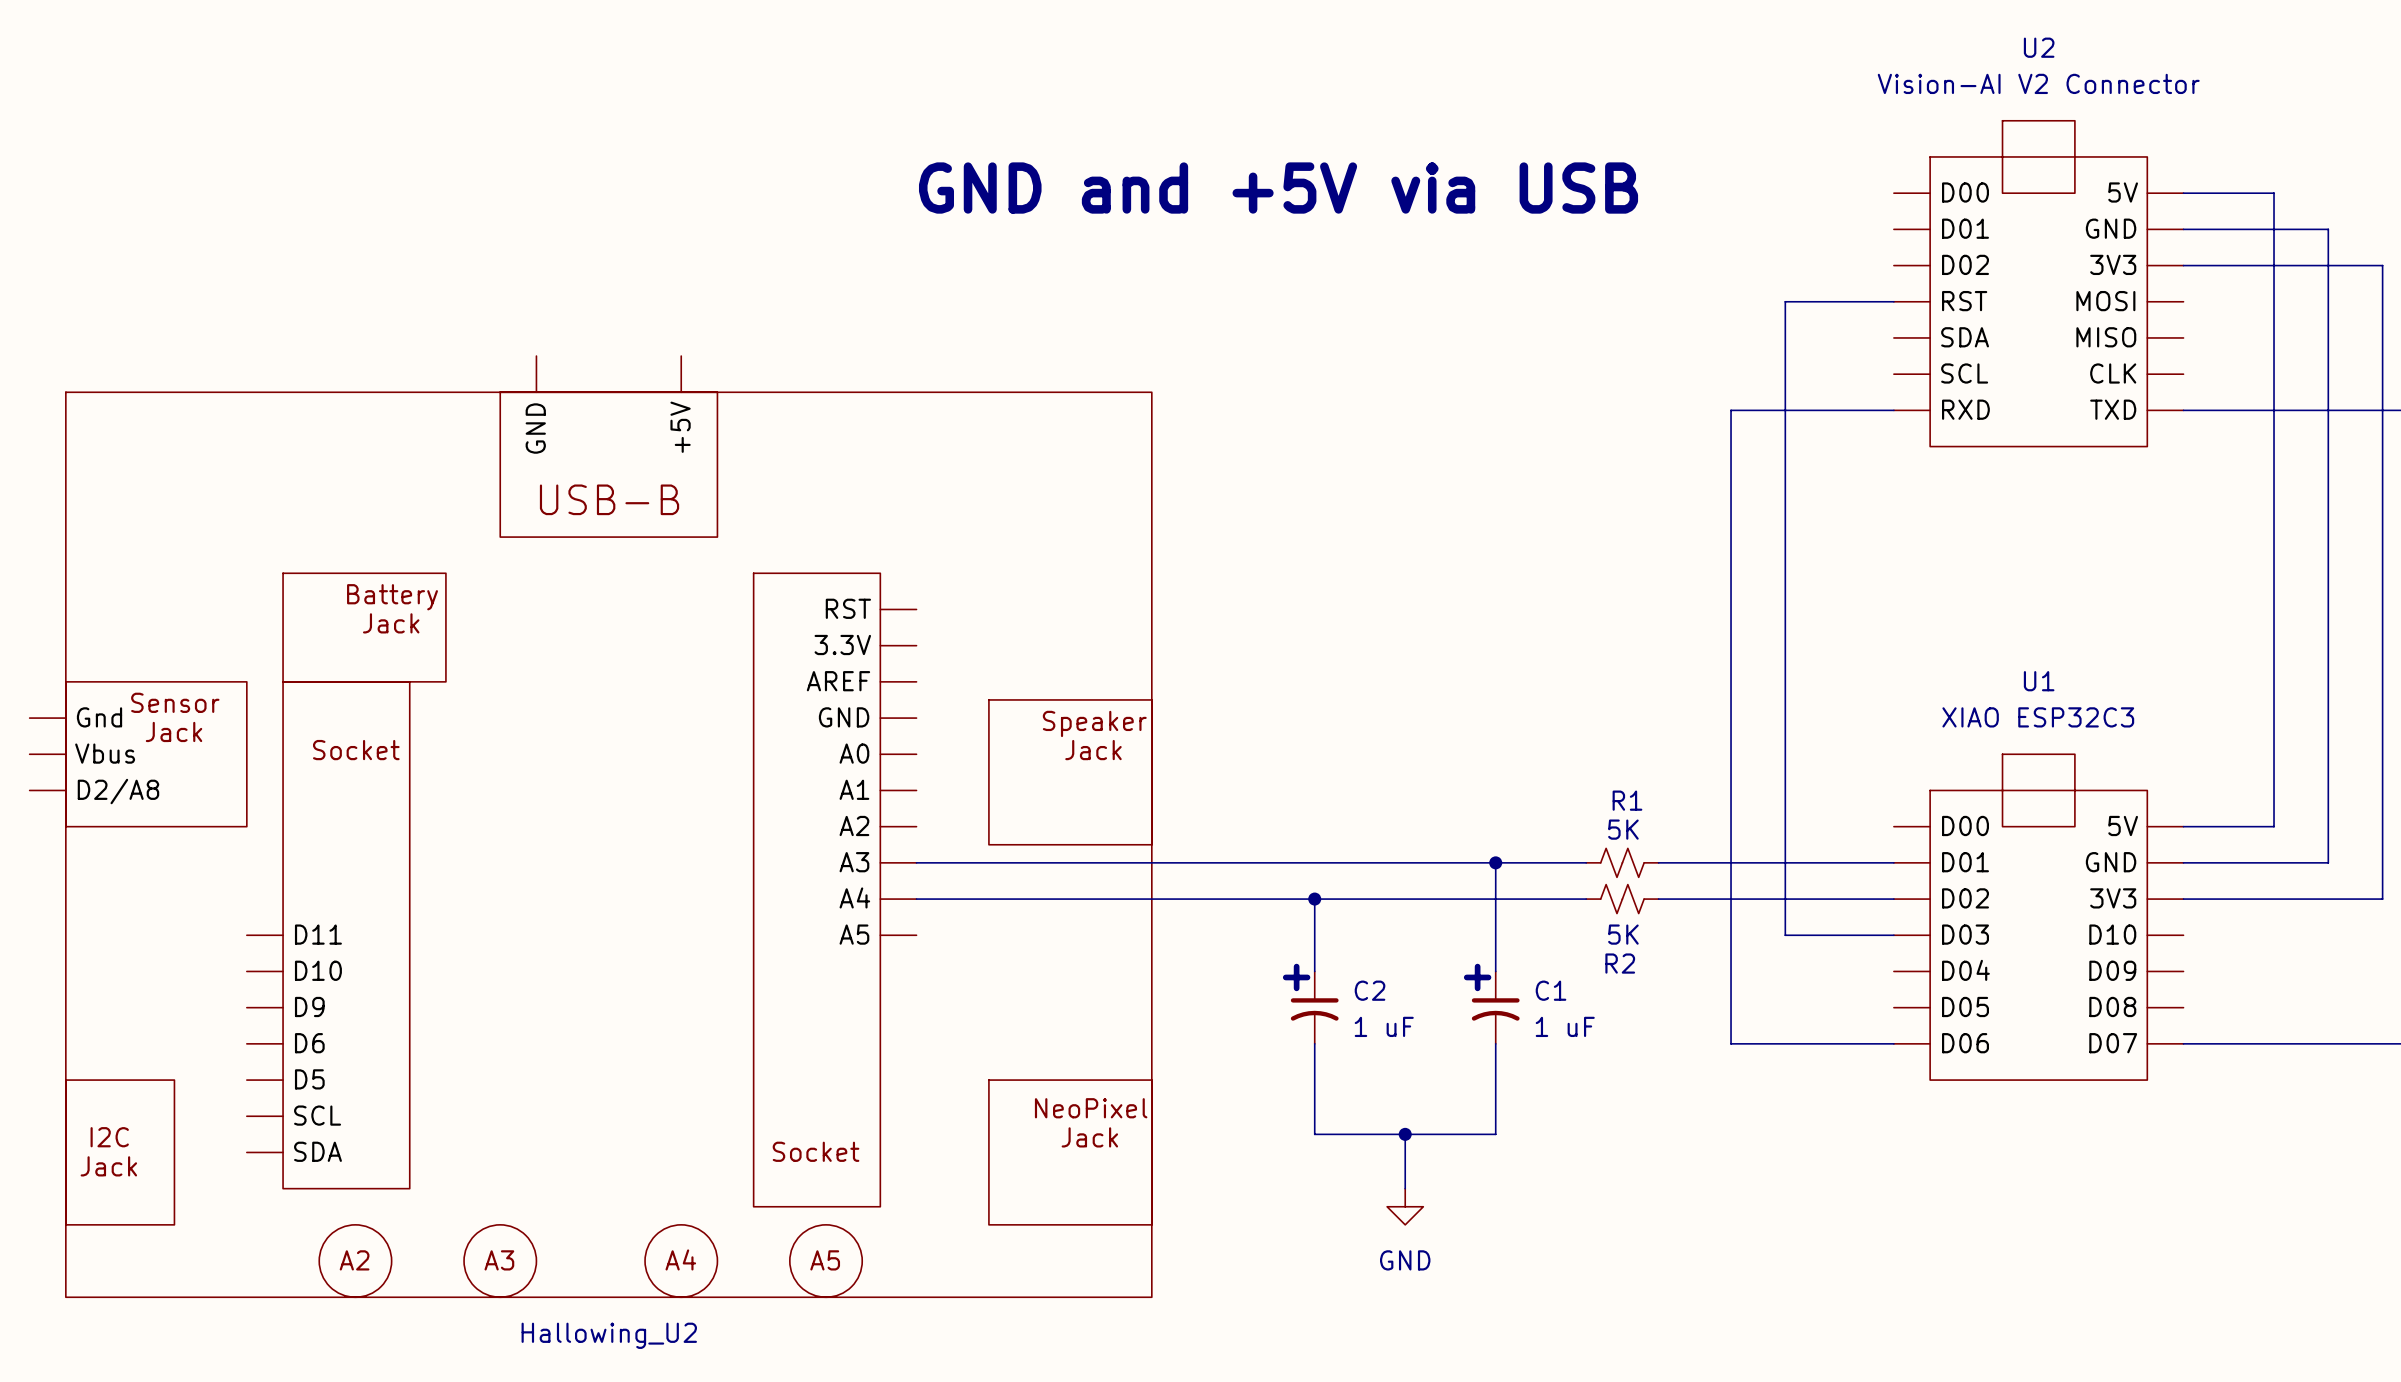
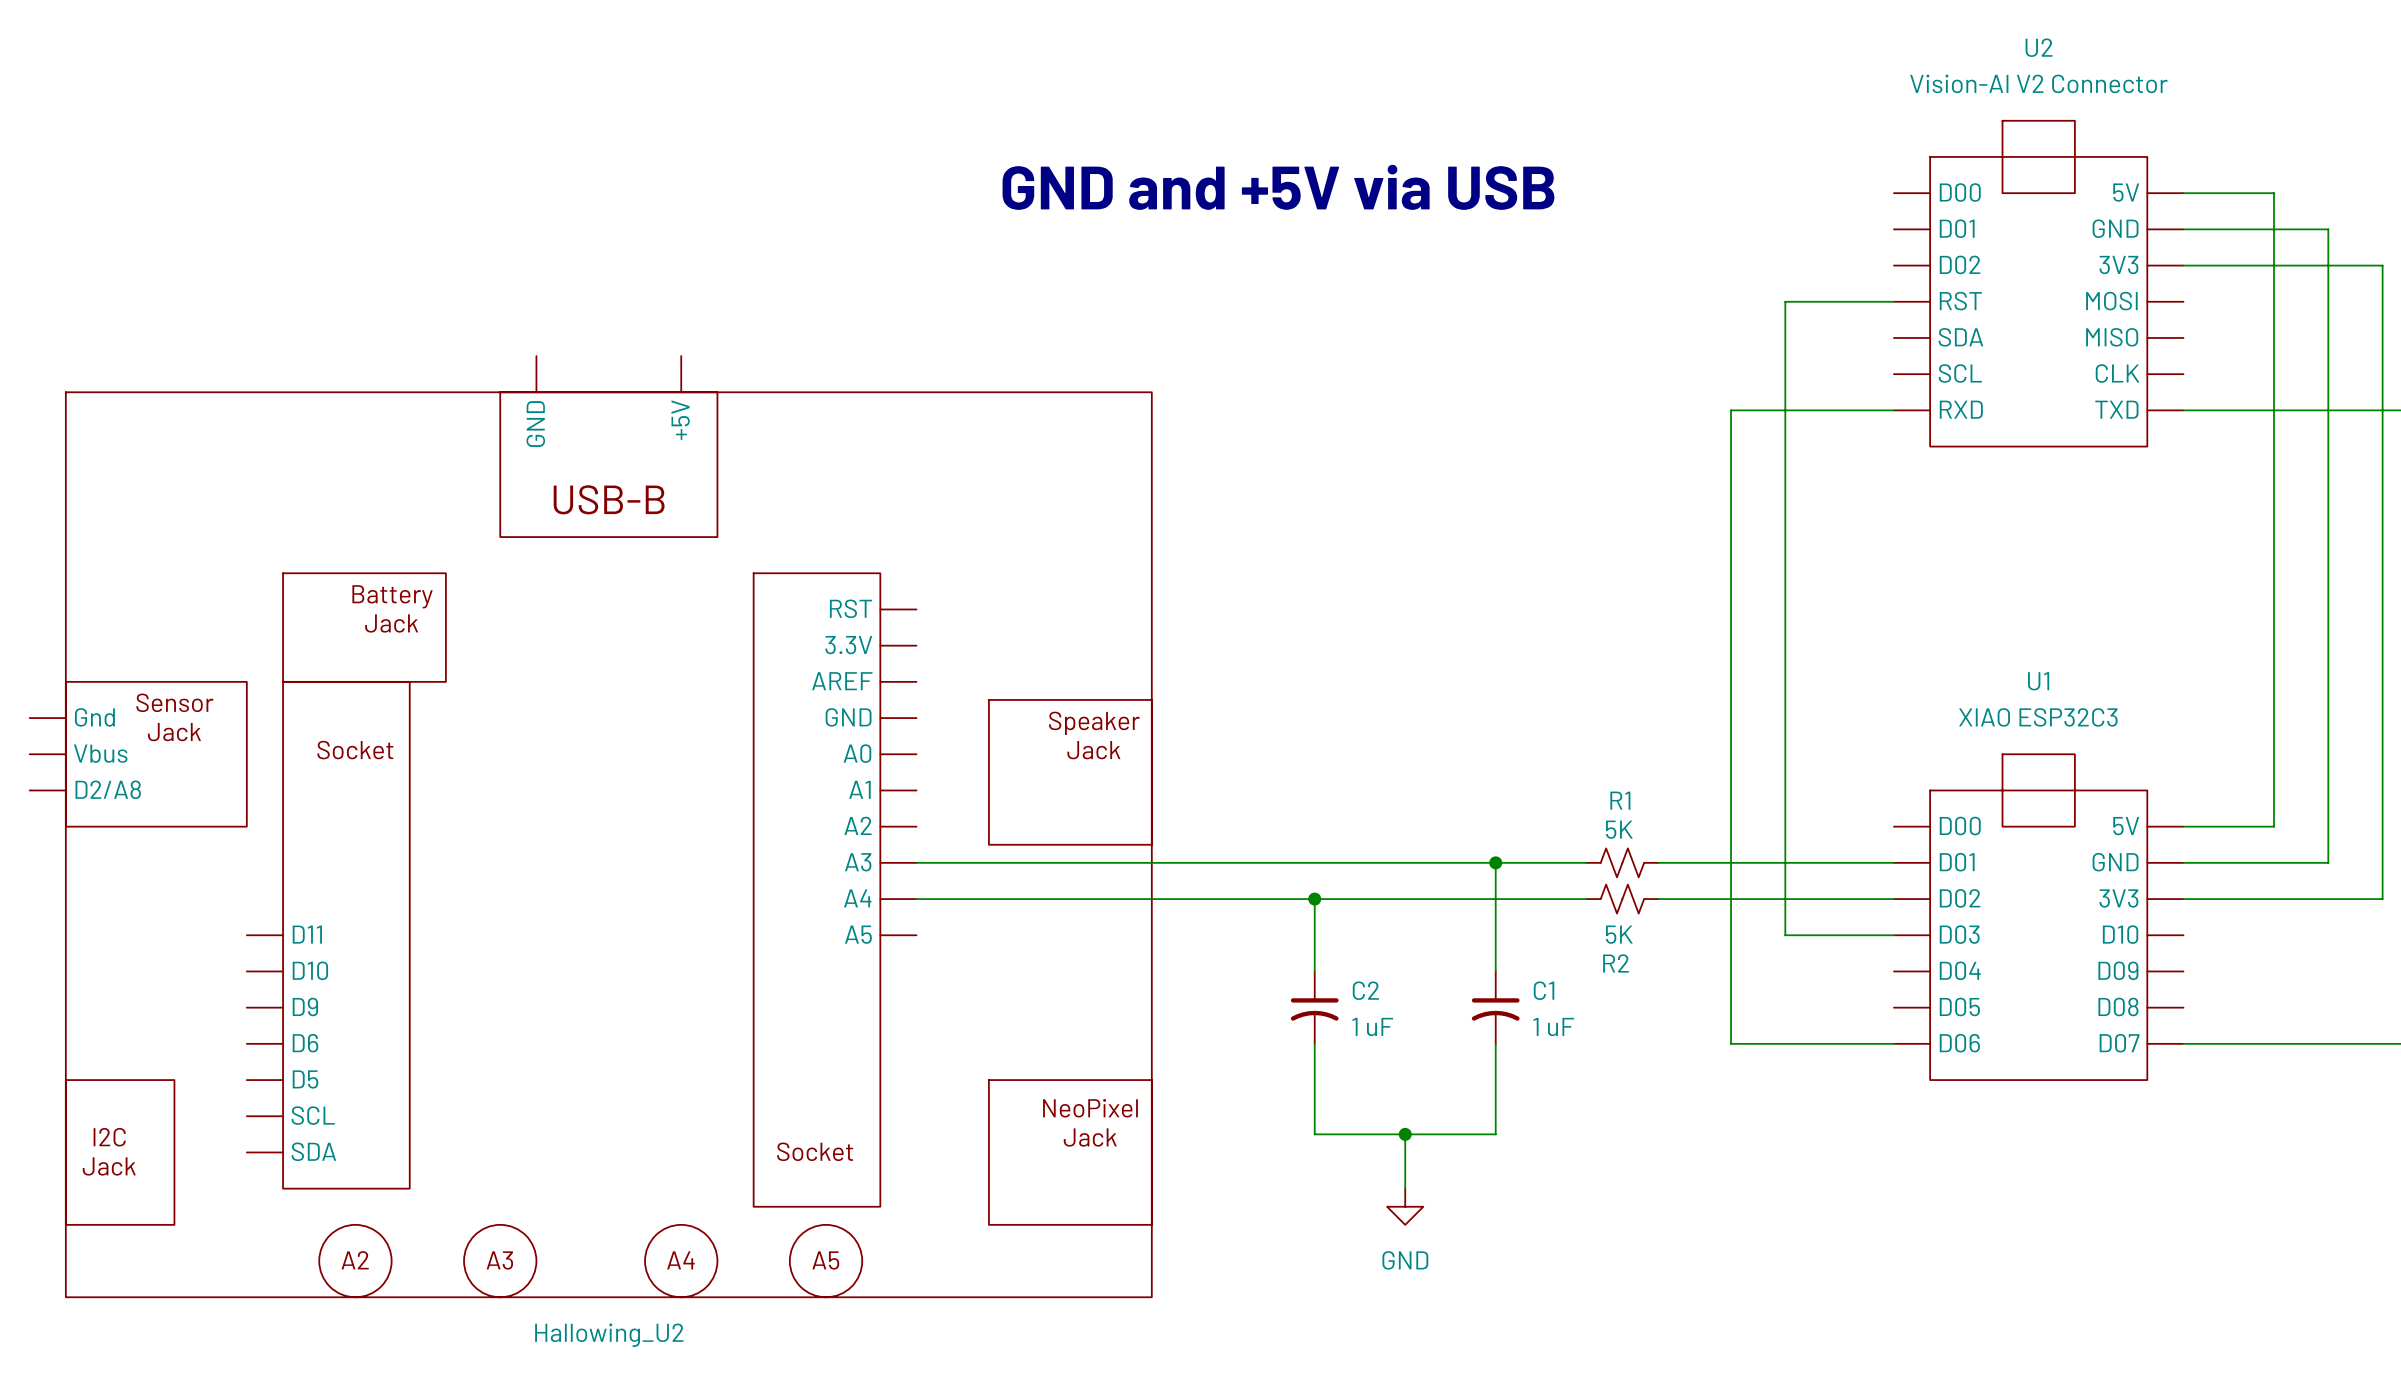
text: + (1296, 977) -> none
text: + (1477, 977) -> none

